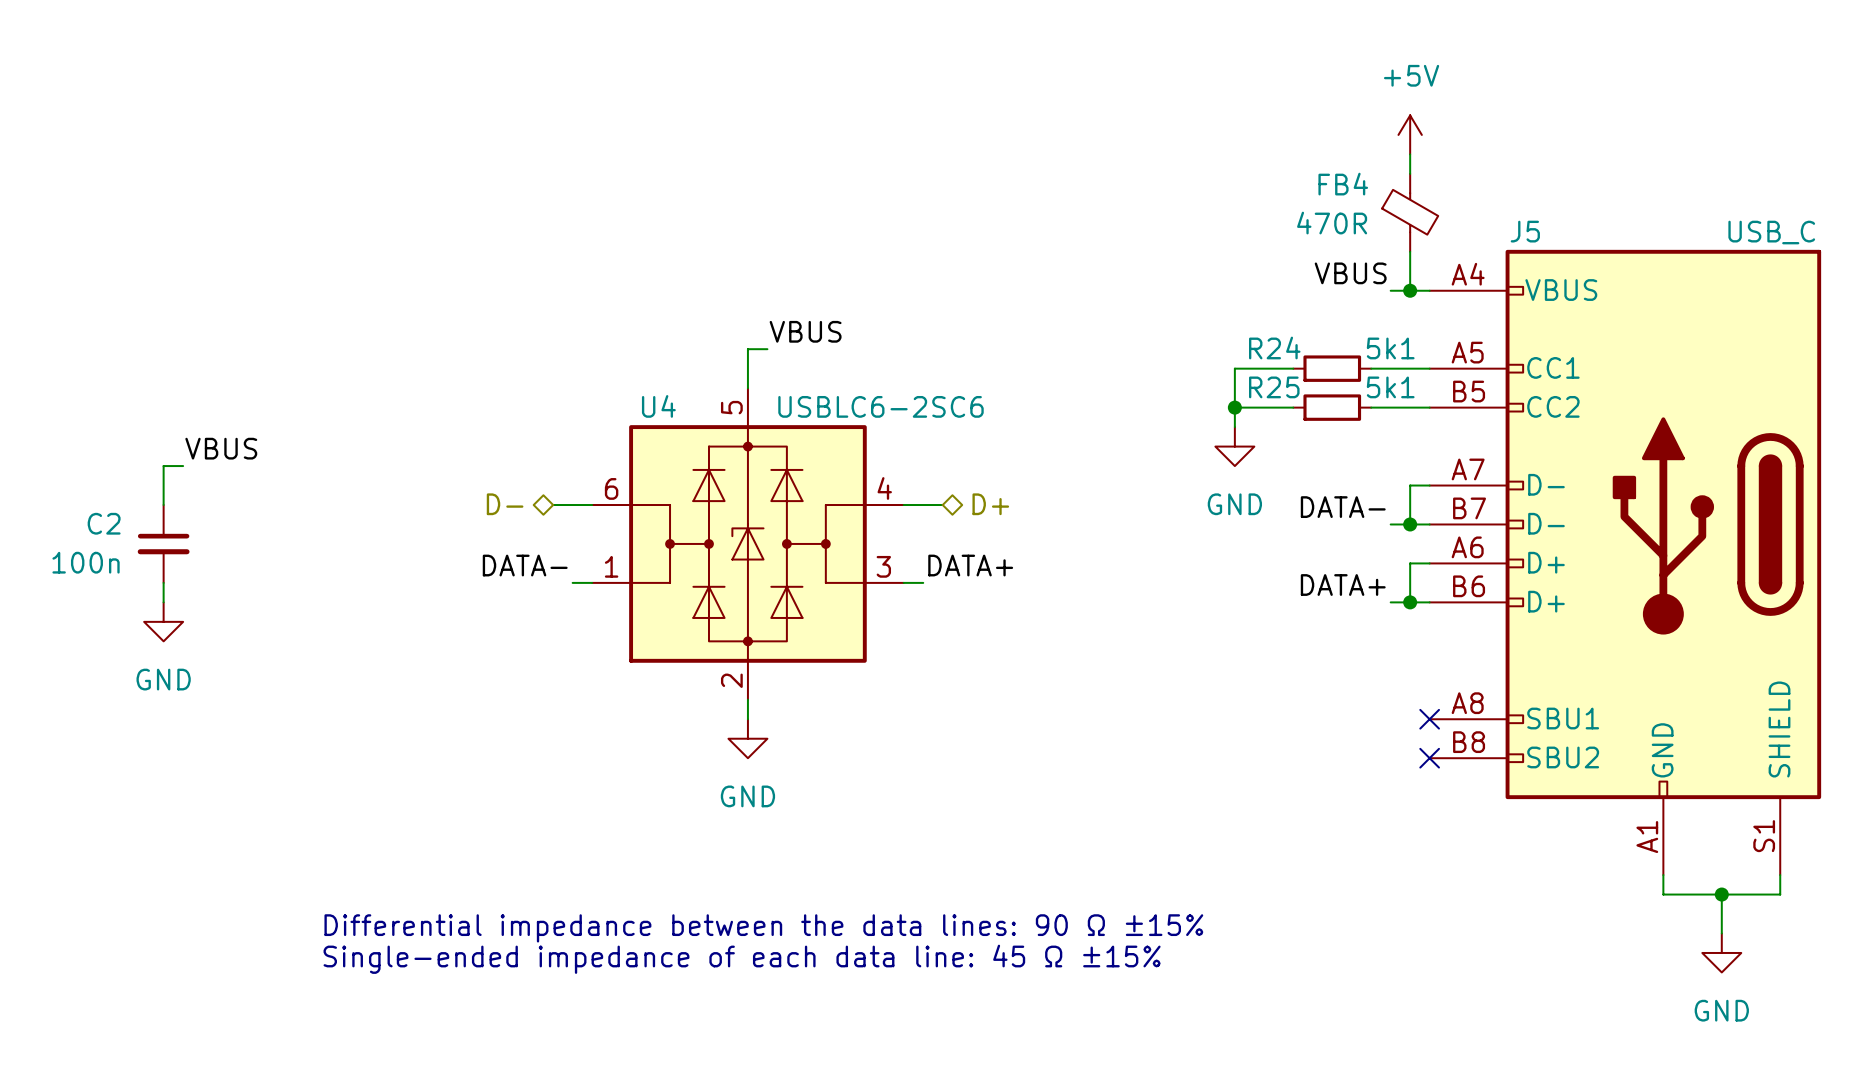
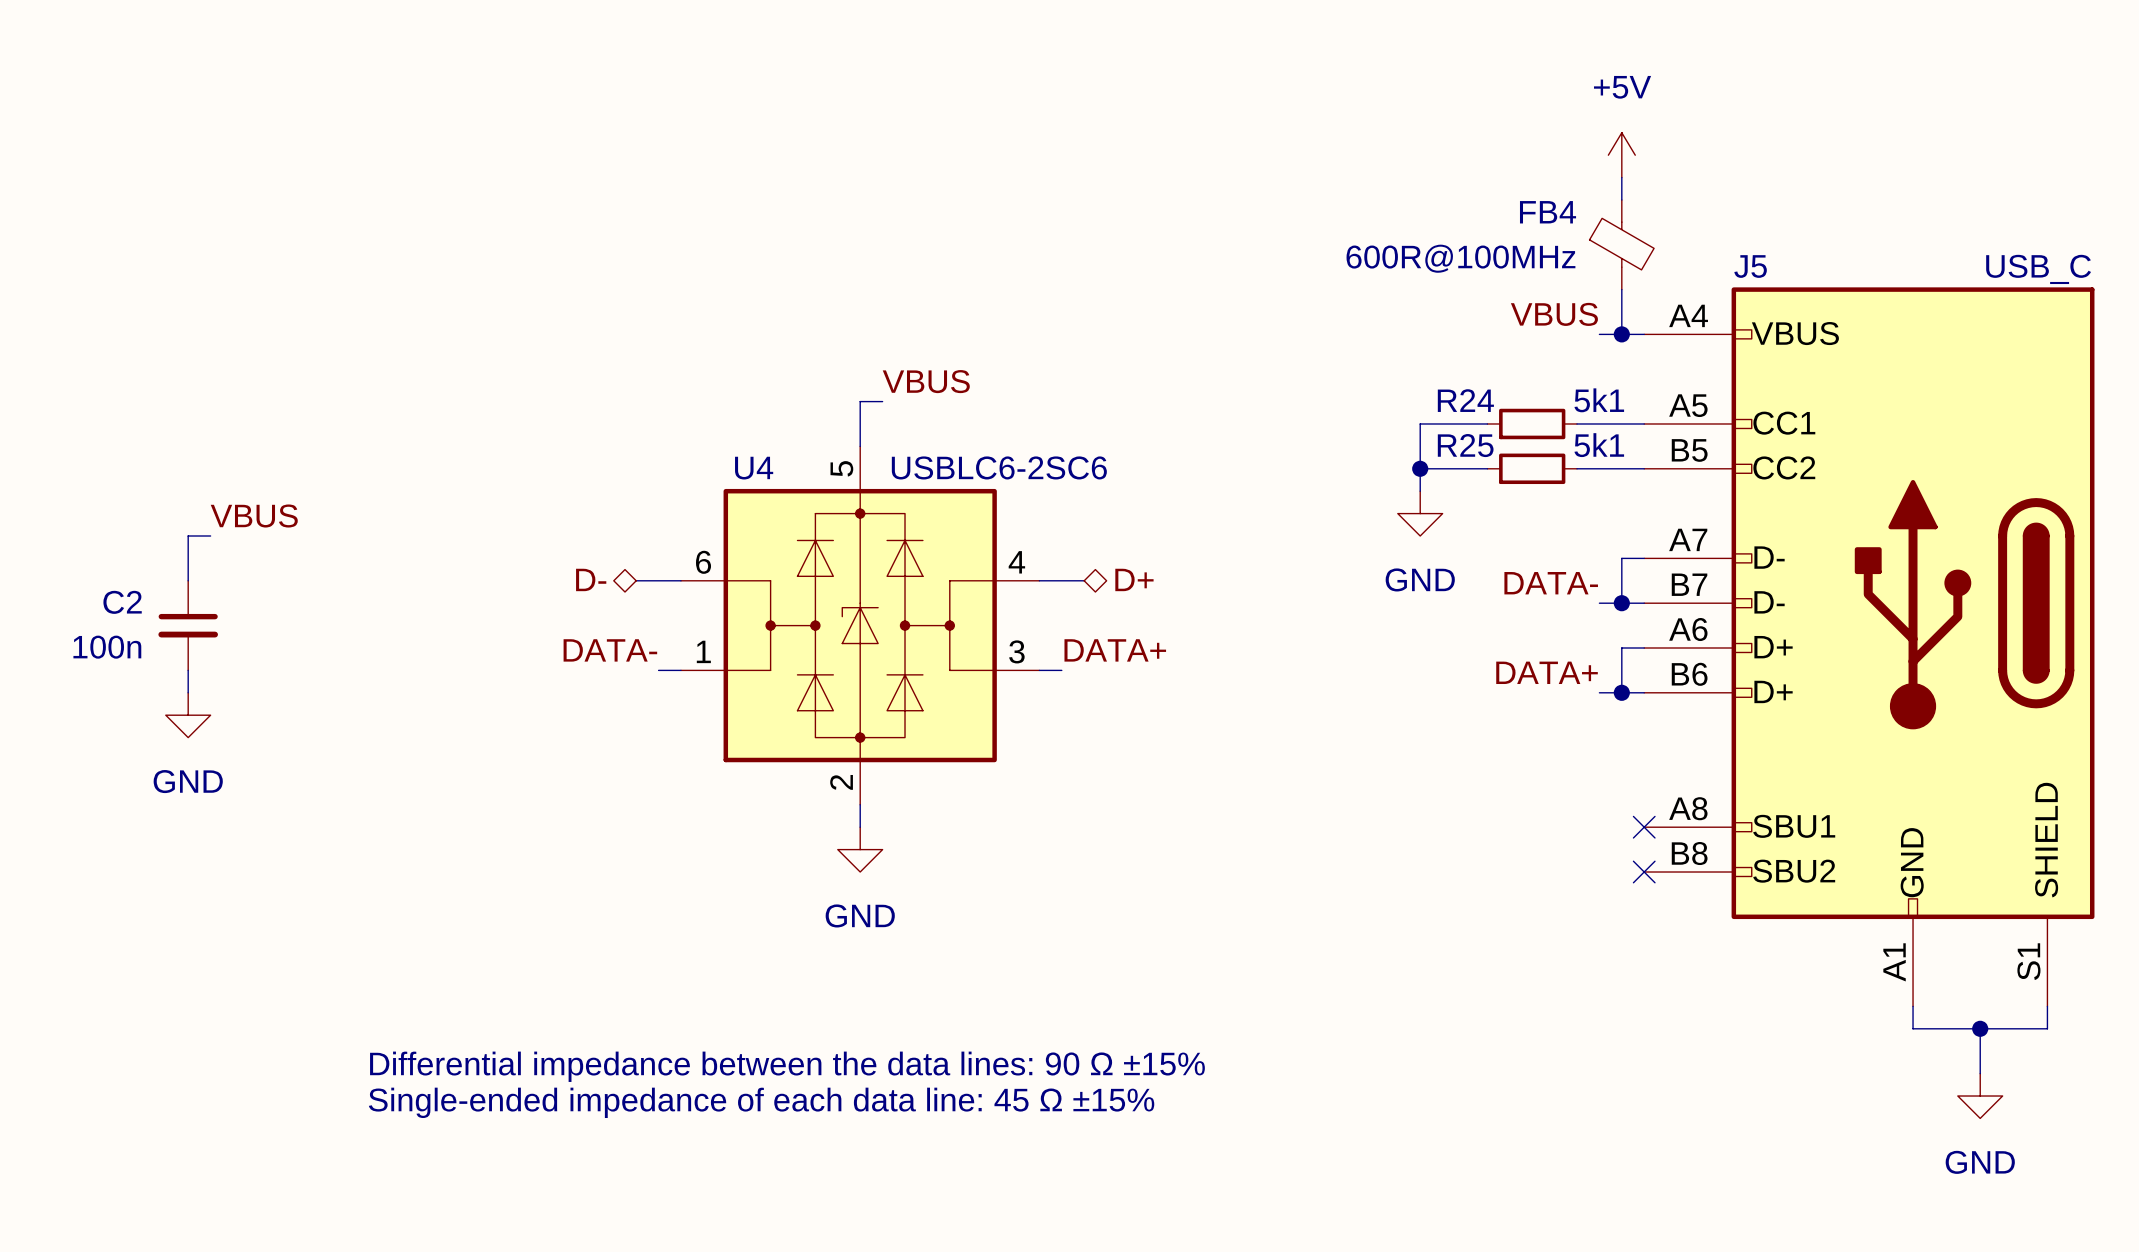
FB4 value: 470R (1332, 223) -> 600R@100MHz (1460, 258)

